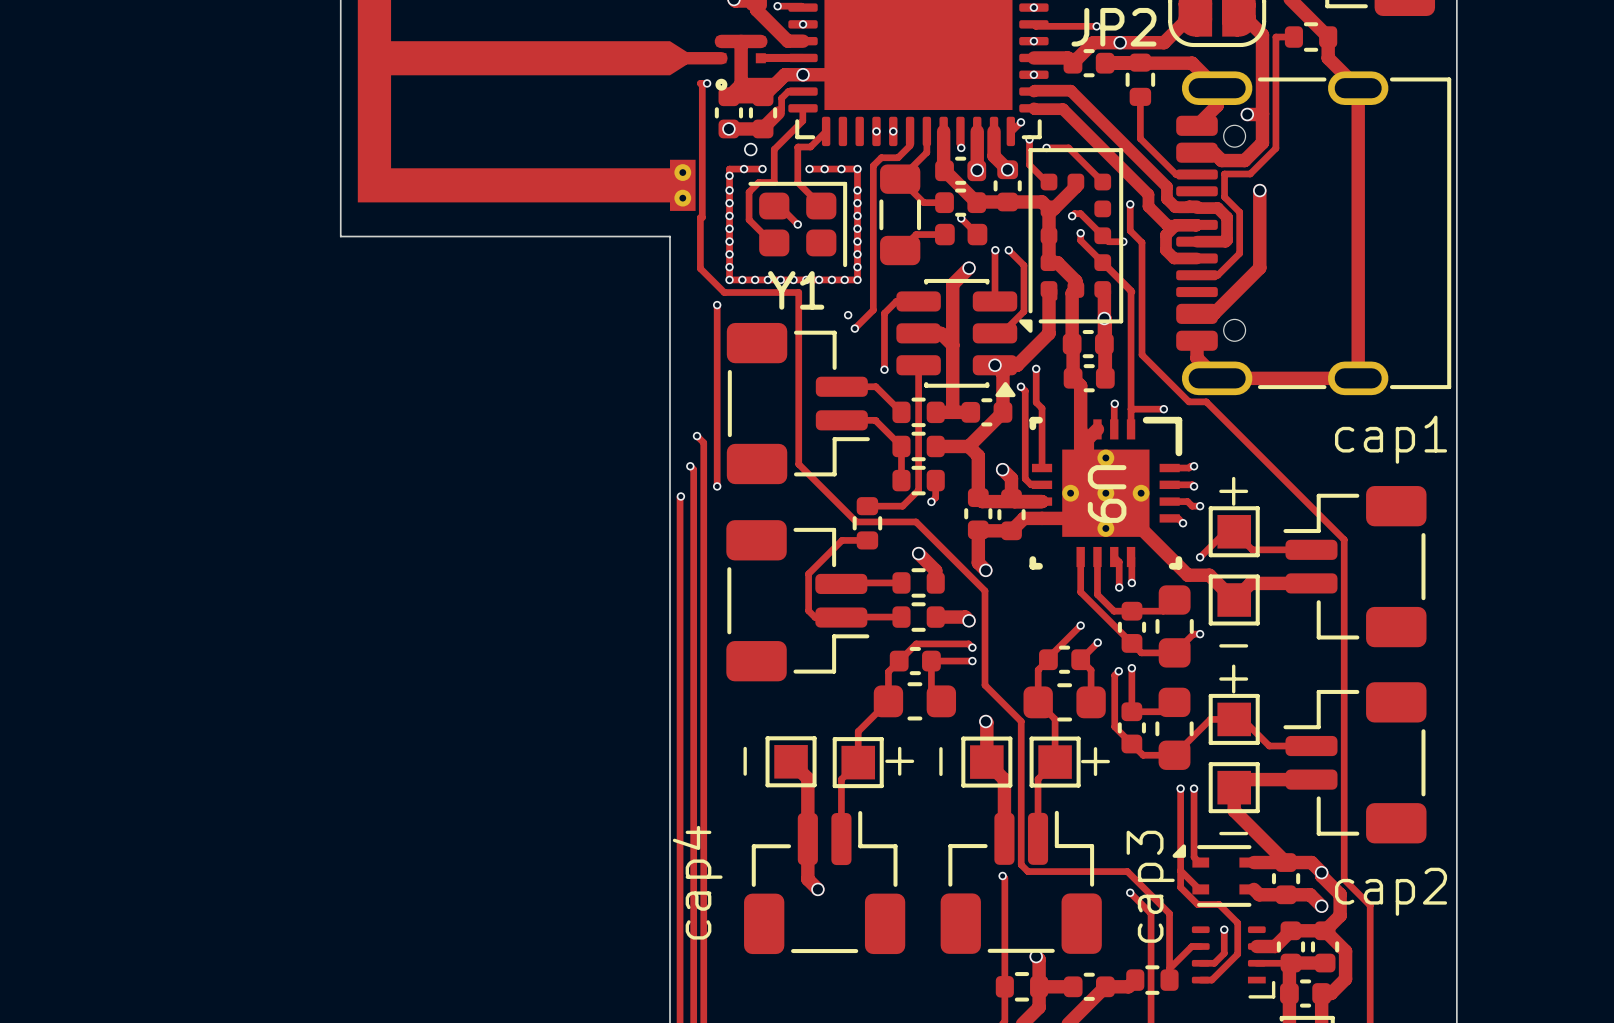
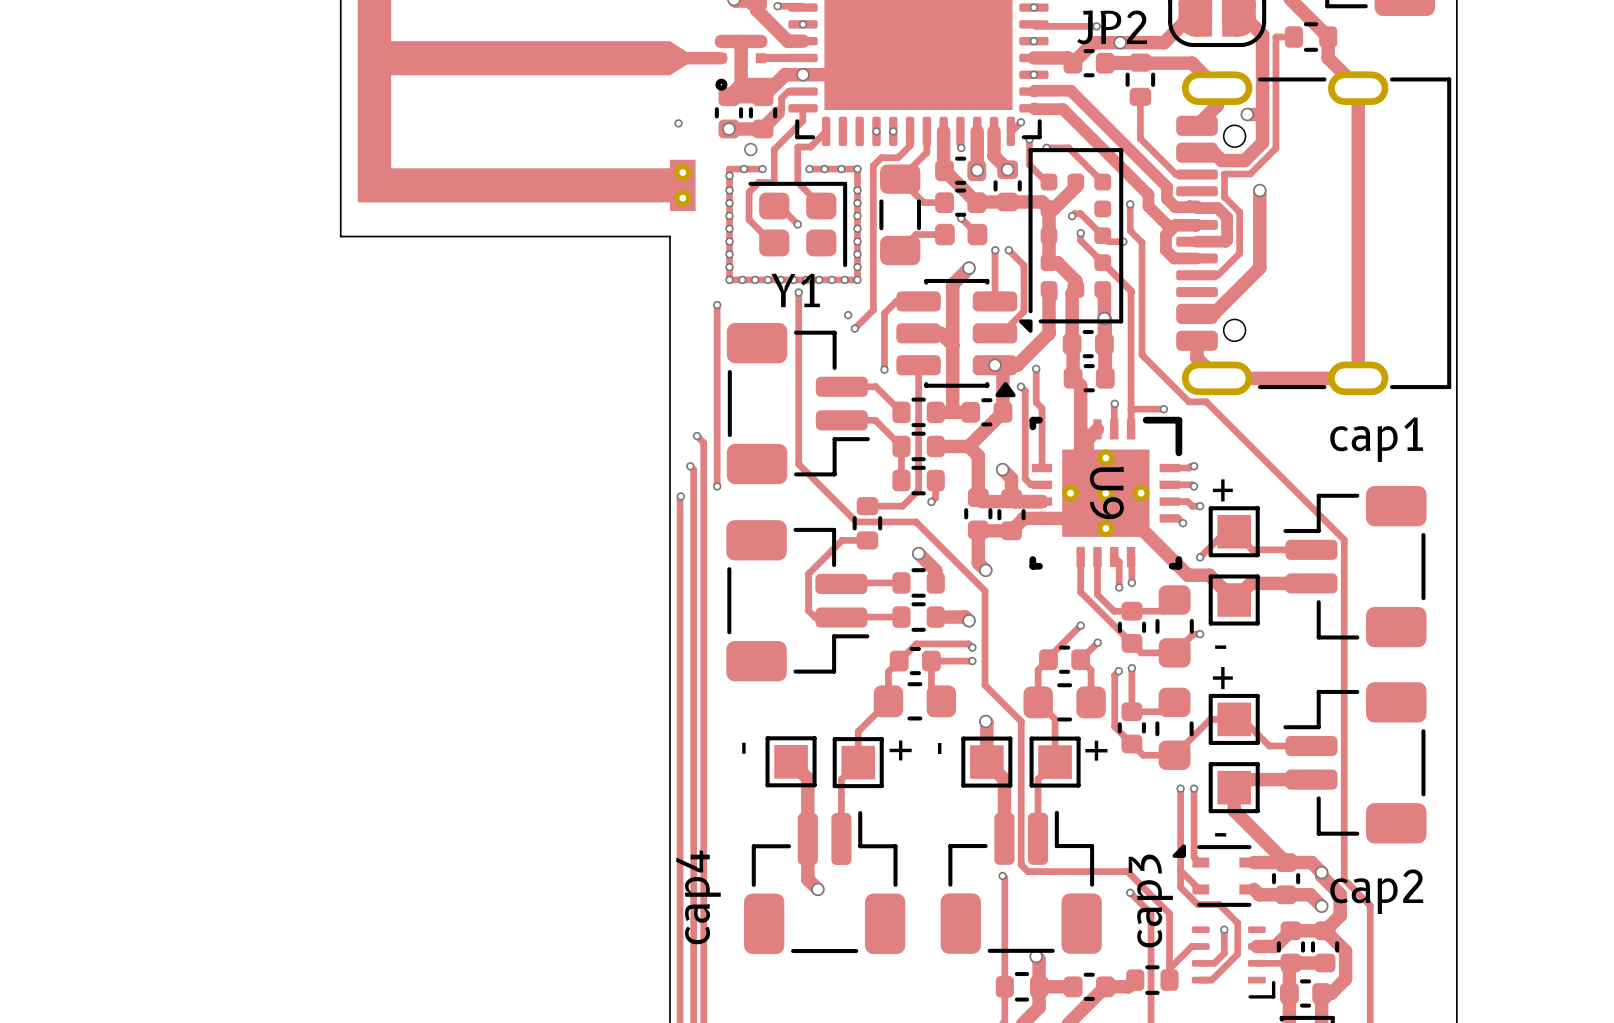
track: (707, 83) (700, 83) (702, 85) (700, 268) (724, 292) (798, 292) -> none
via: (707, 83) -> none
via: none -> (678, 123)
via: none -> (798, 292)

